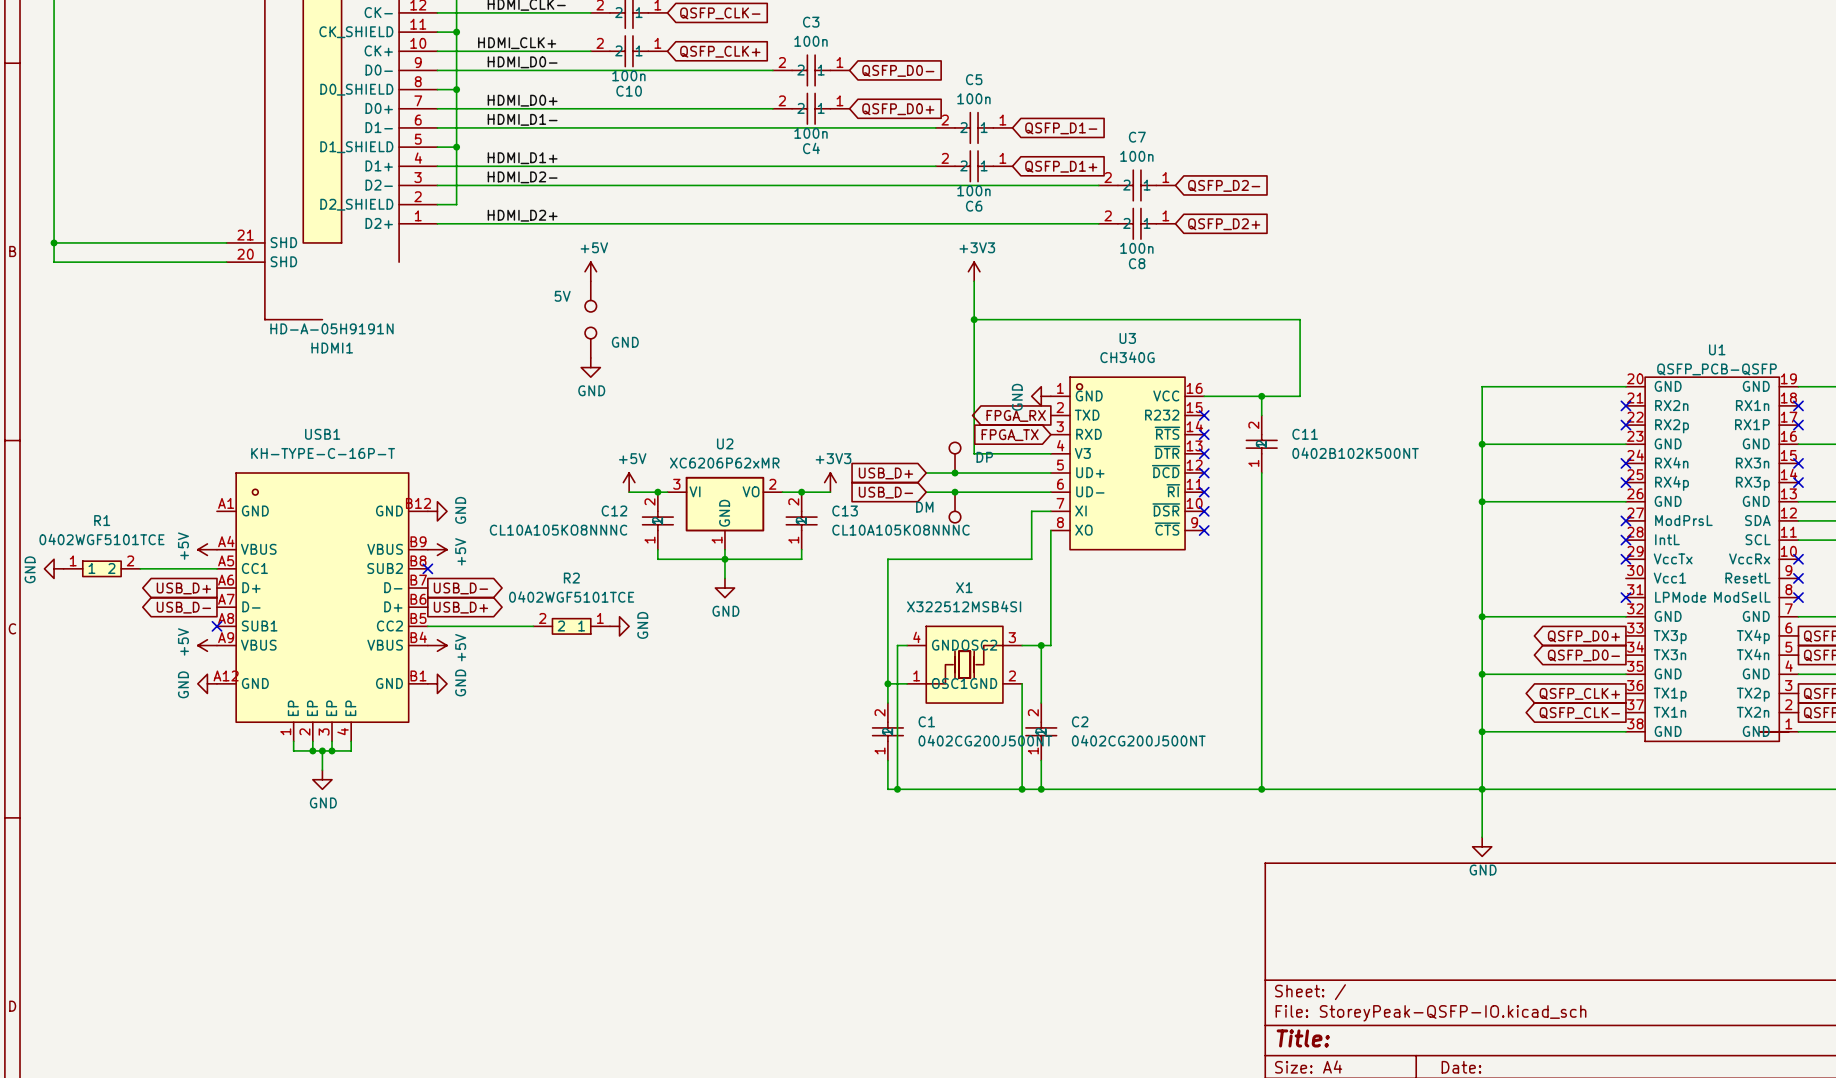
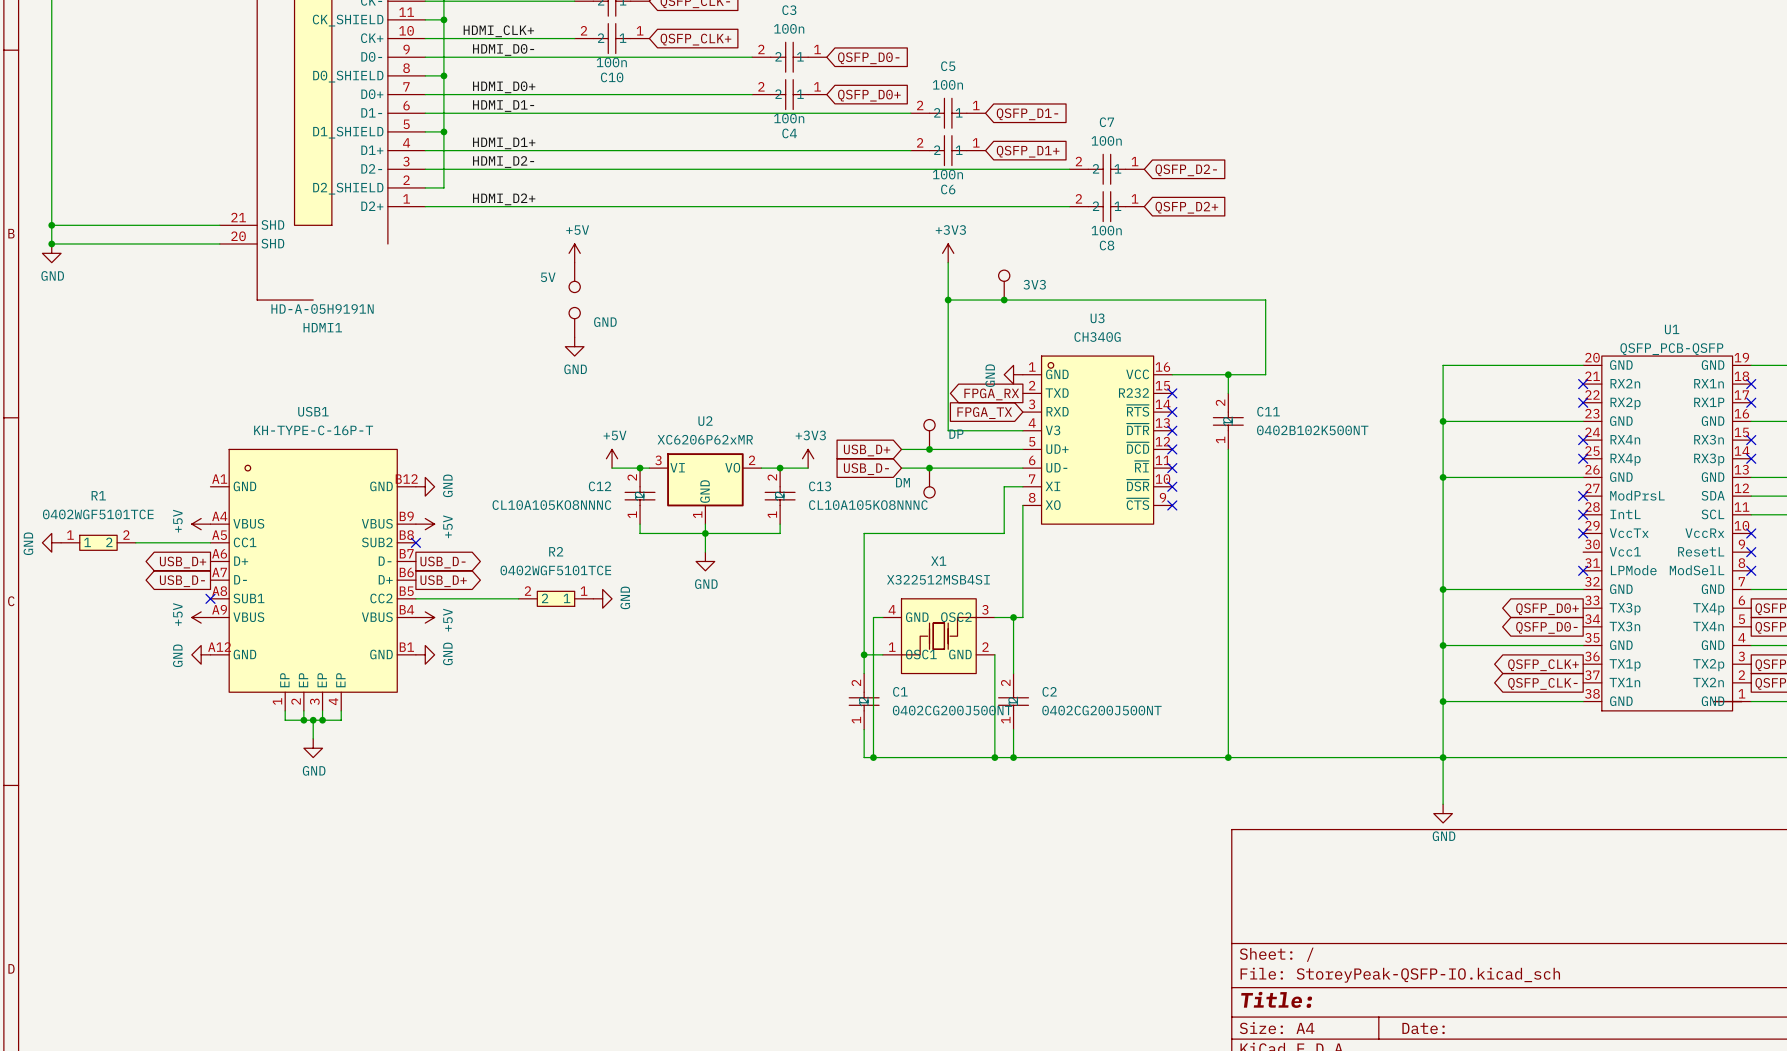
junction: none -> (51, 243)
power symbol: none -> GND (51, 253)
part: none -> 3V3 (1004, 285)
junction: none -> (1004, 300)

